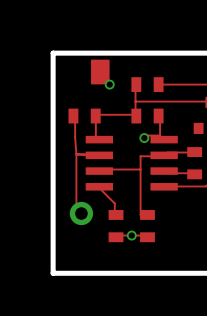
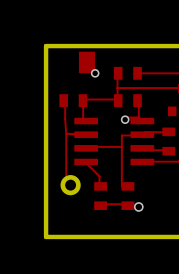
via: (131, 235) -> none
via: none -> (138, 206)

